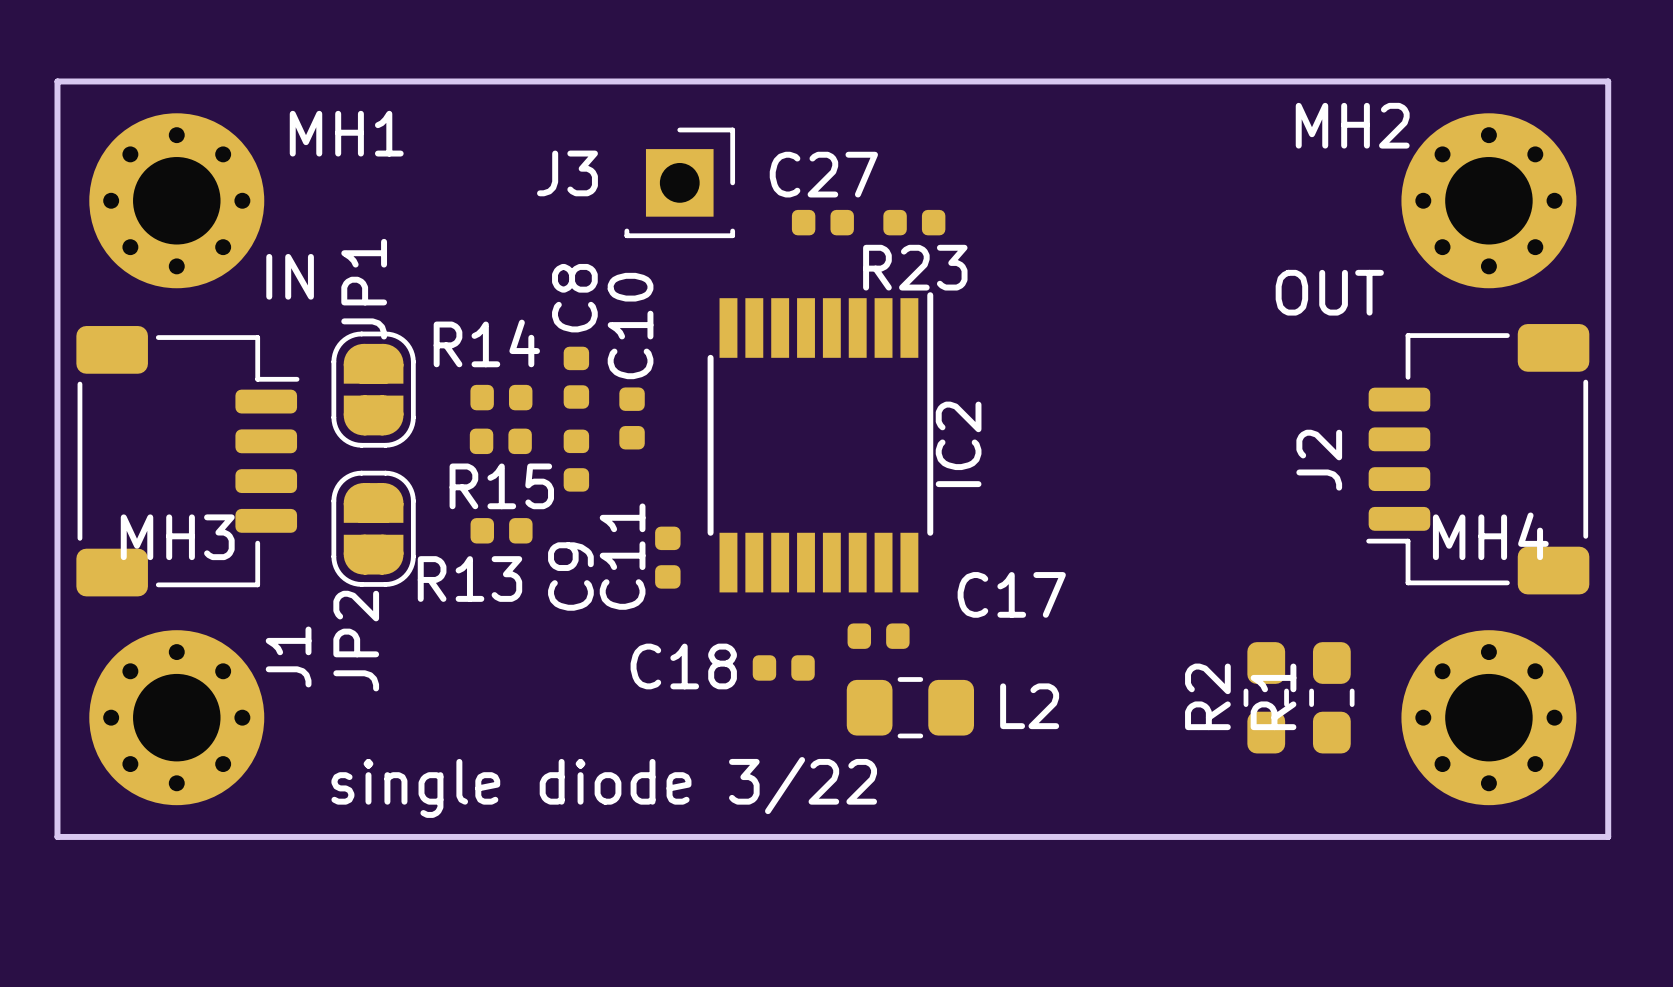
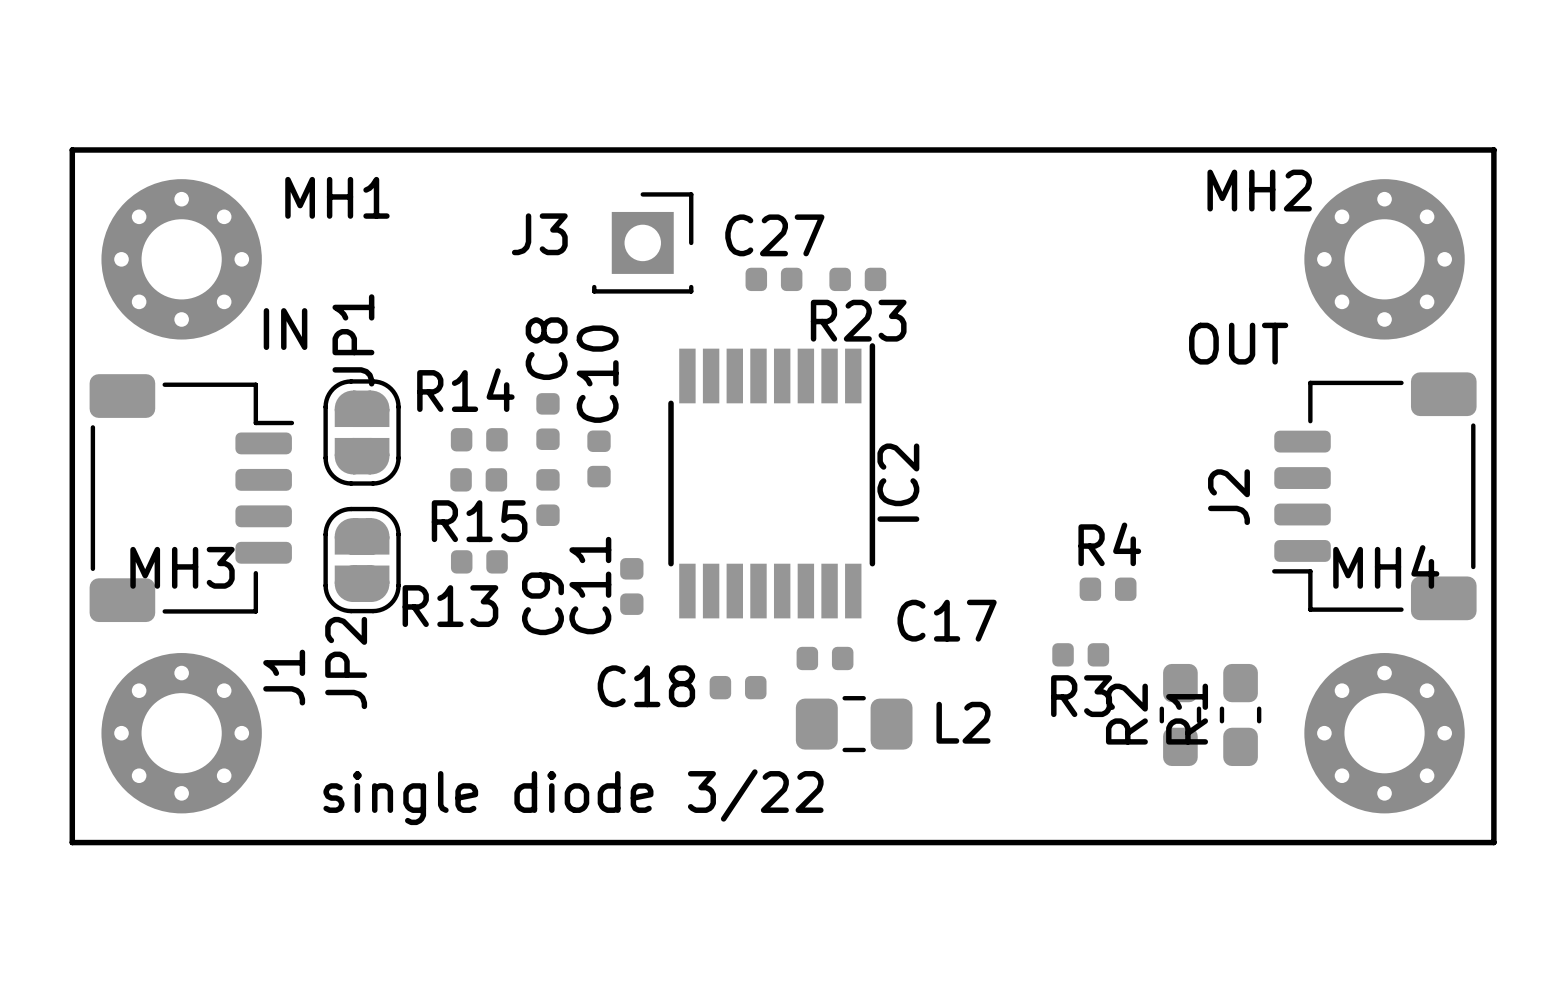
R4: none -> (1108, 589)
R3: none -> (1080, 654)

